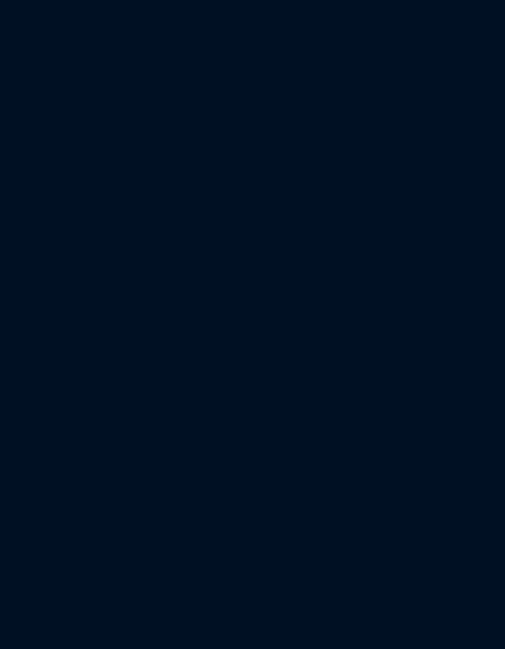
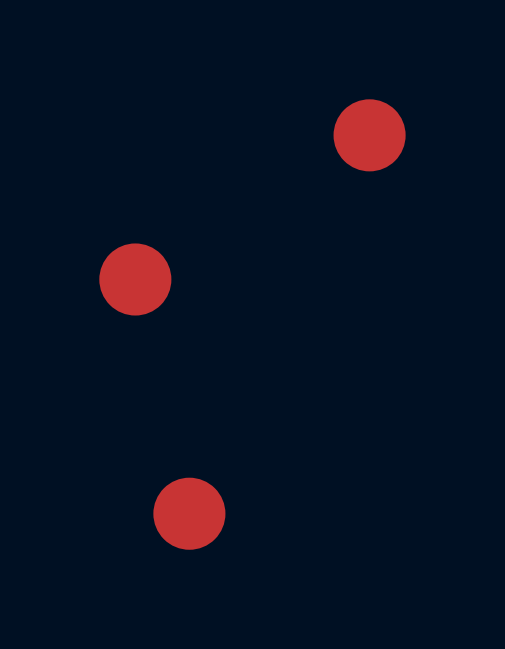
part: none -> (369, 135)
part: none -> (135, 279)
part: none -> (189, 513)

